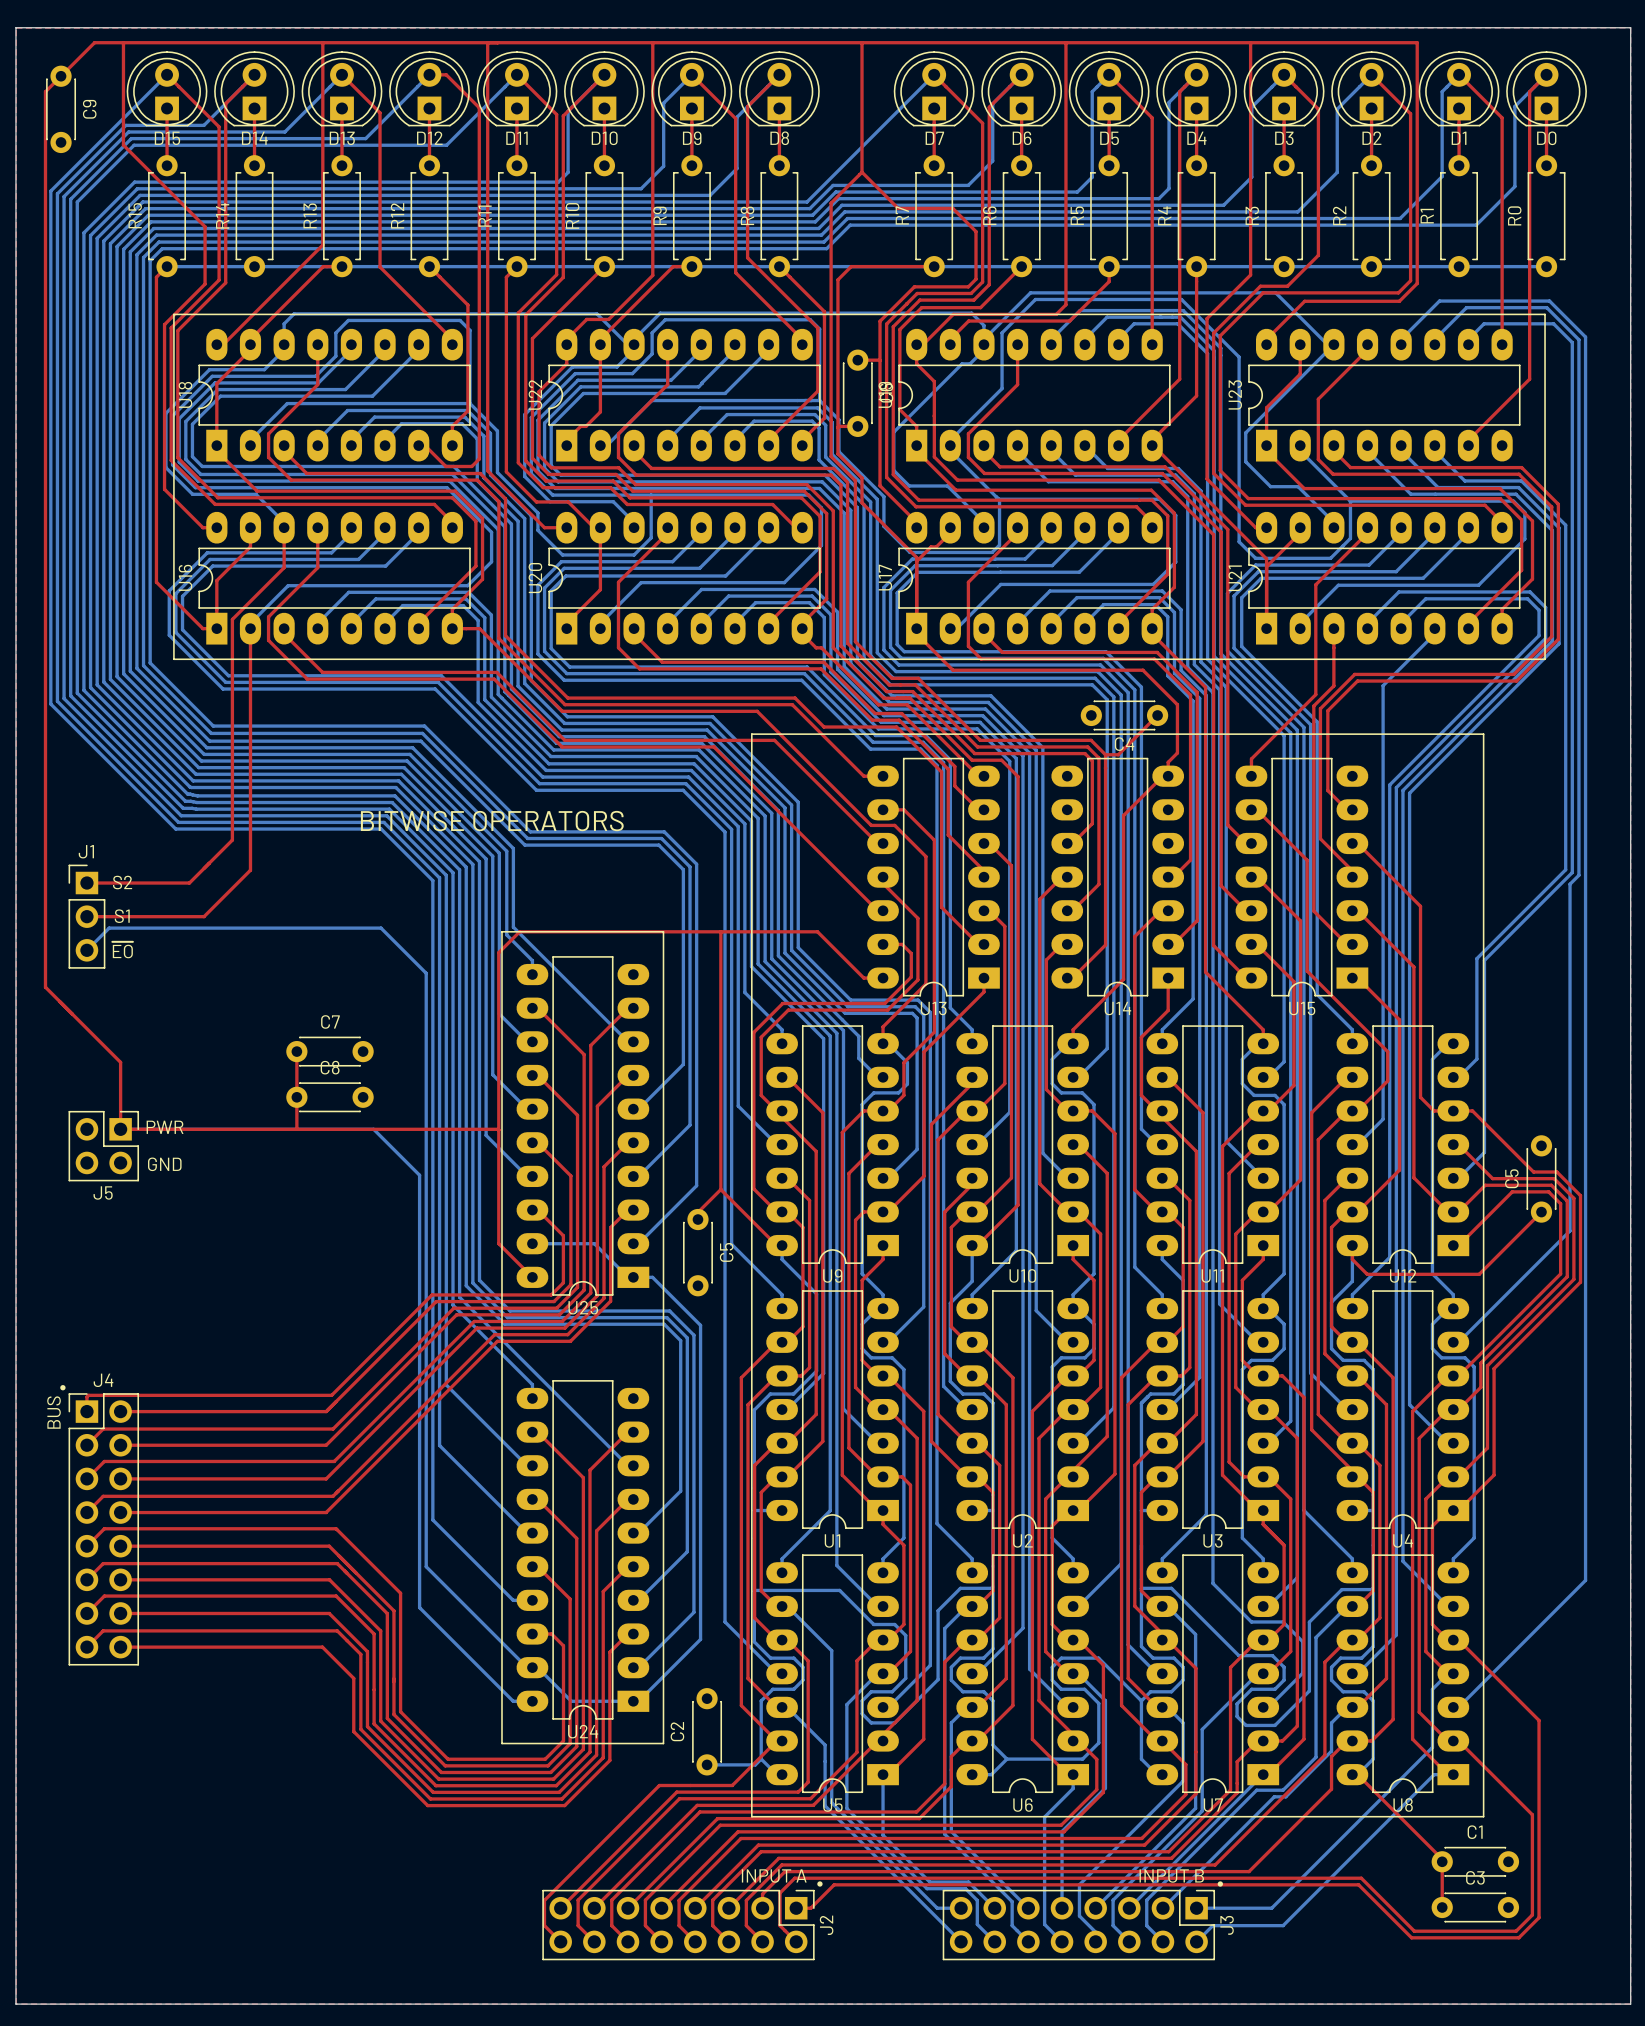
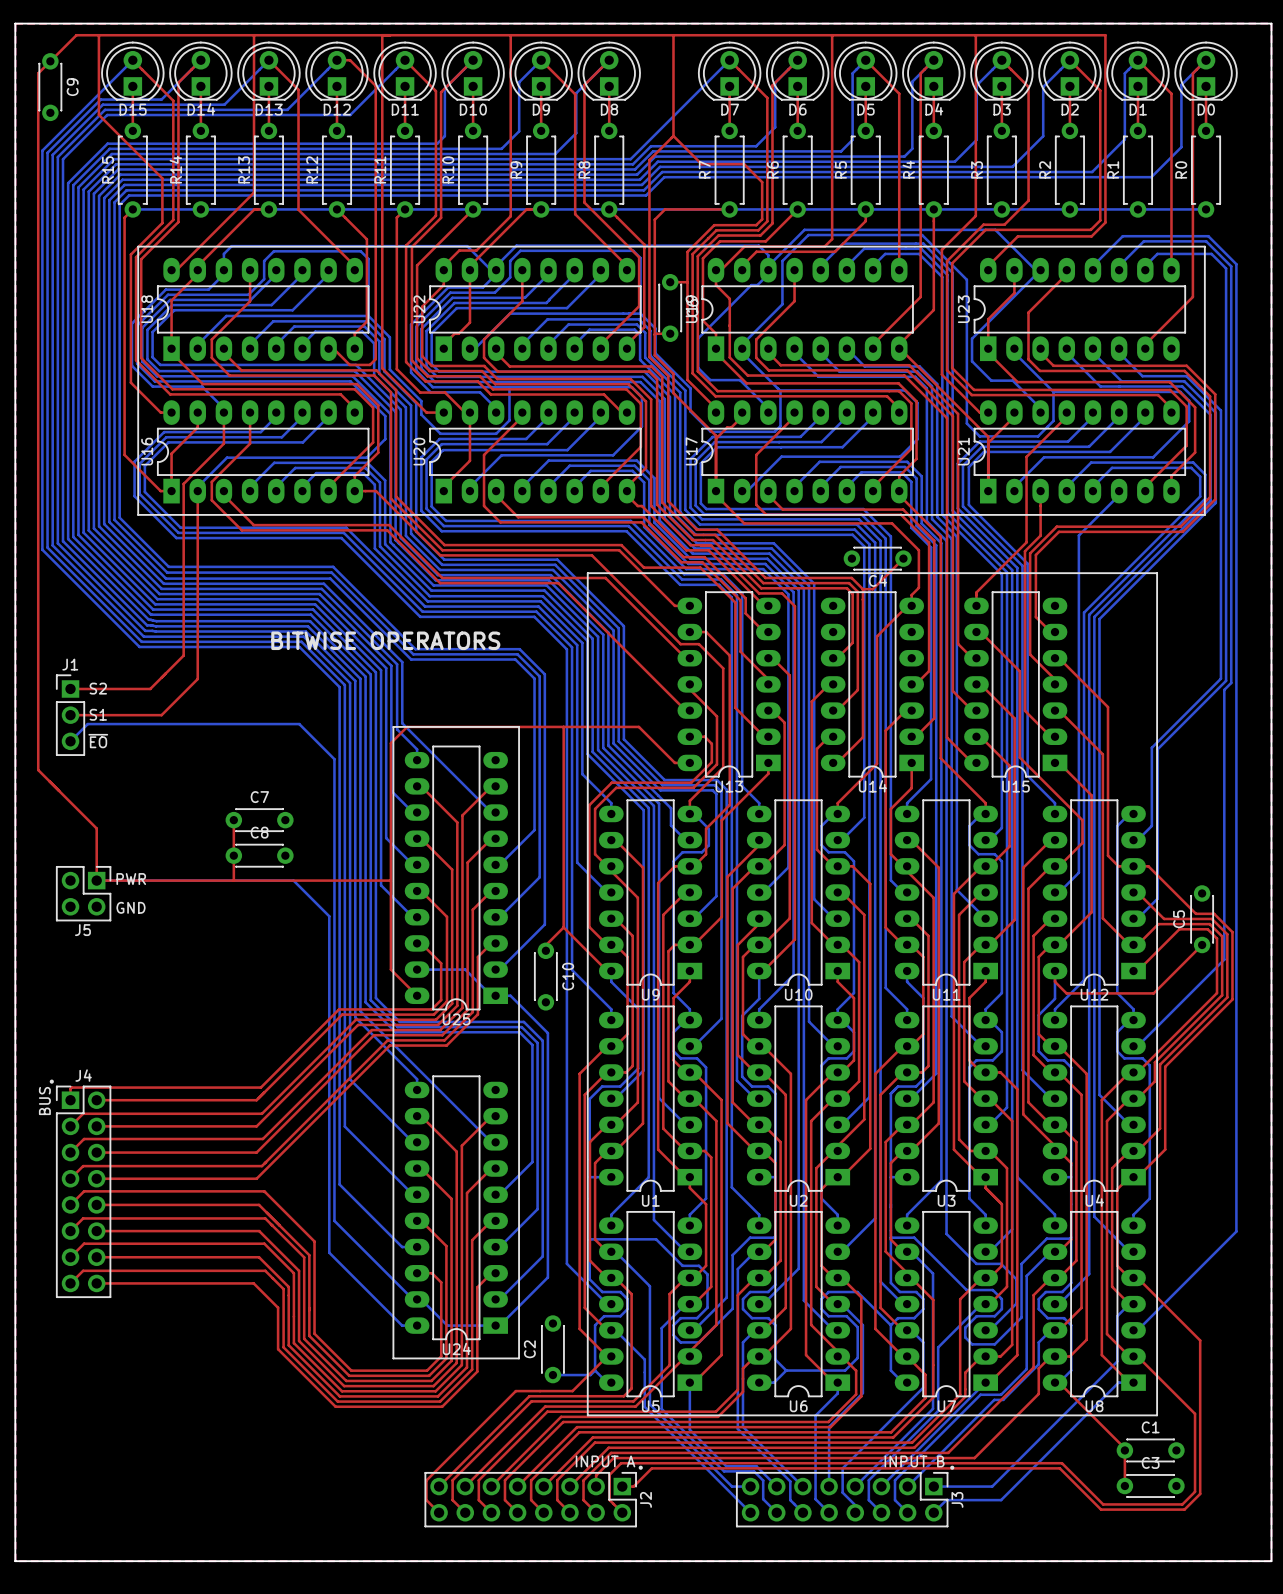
C5 name: C5 (726, 1252) -> C10 (568, 976)

